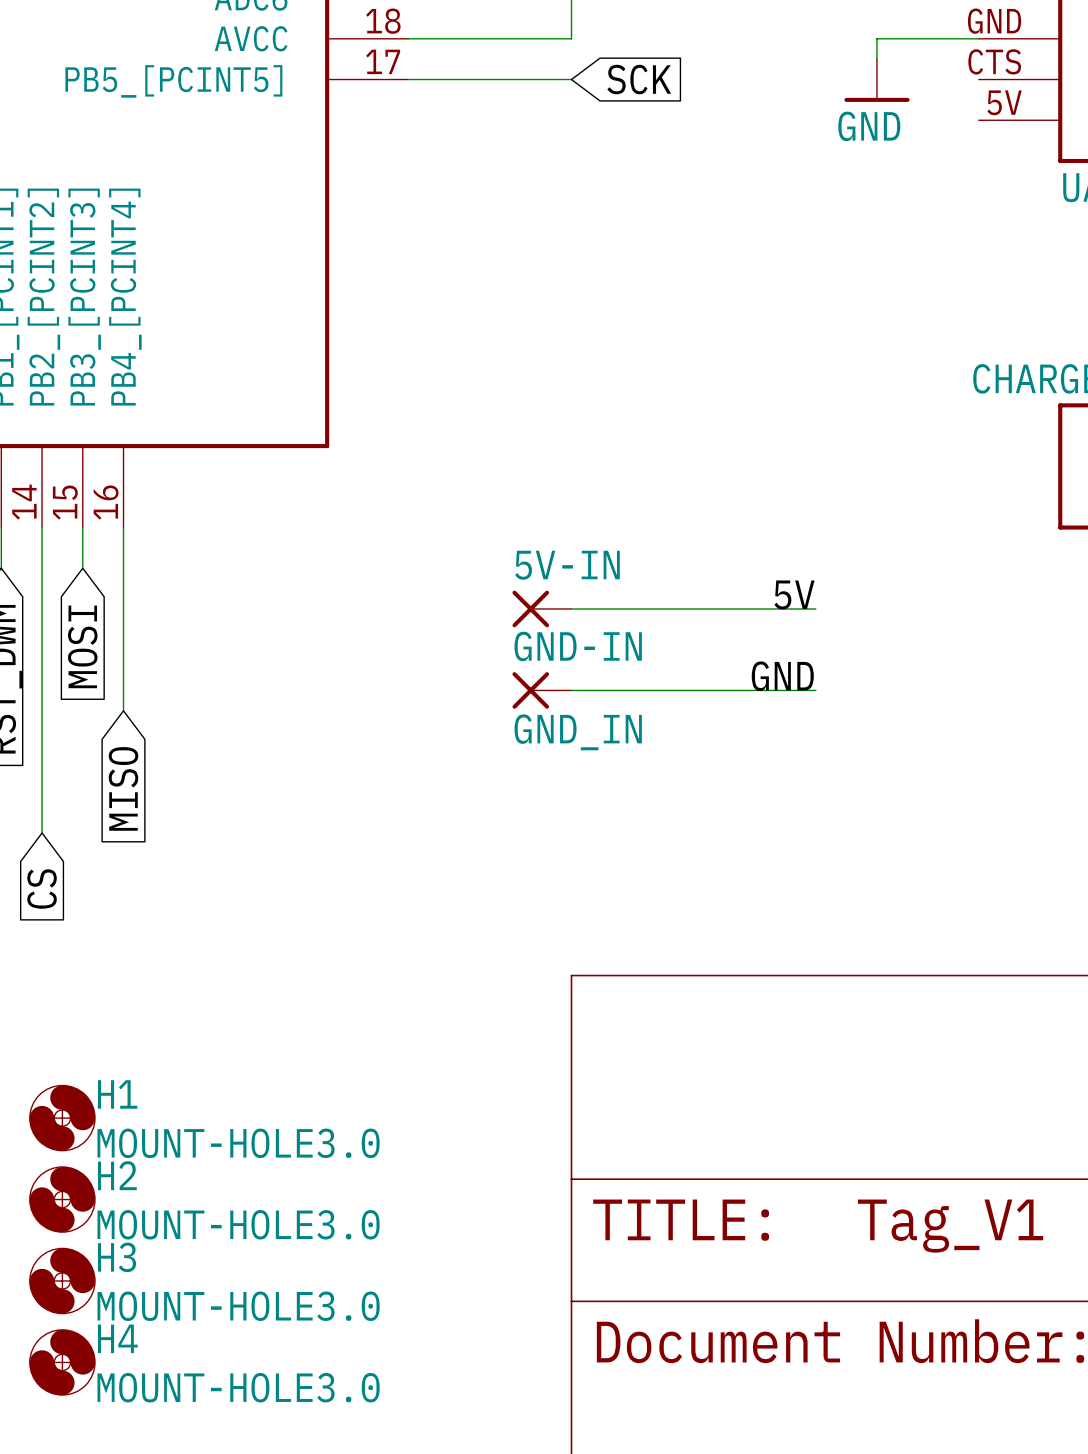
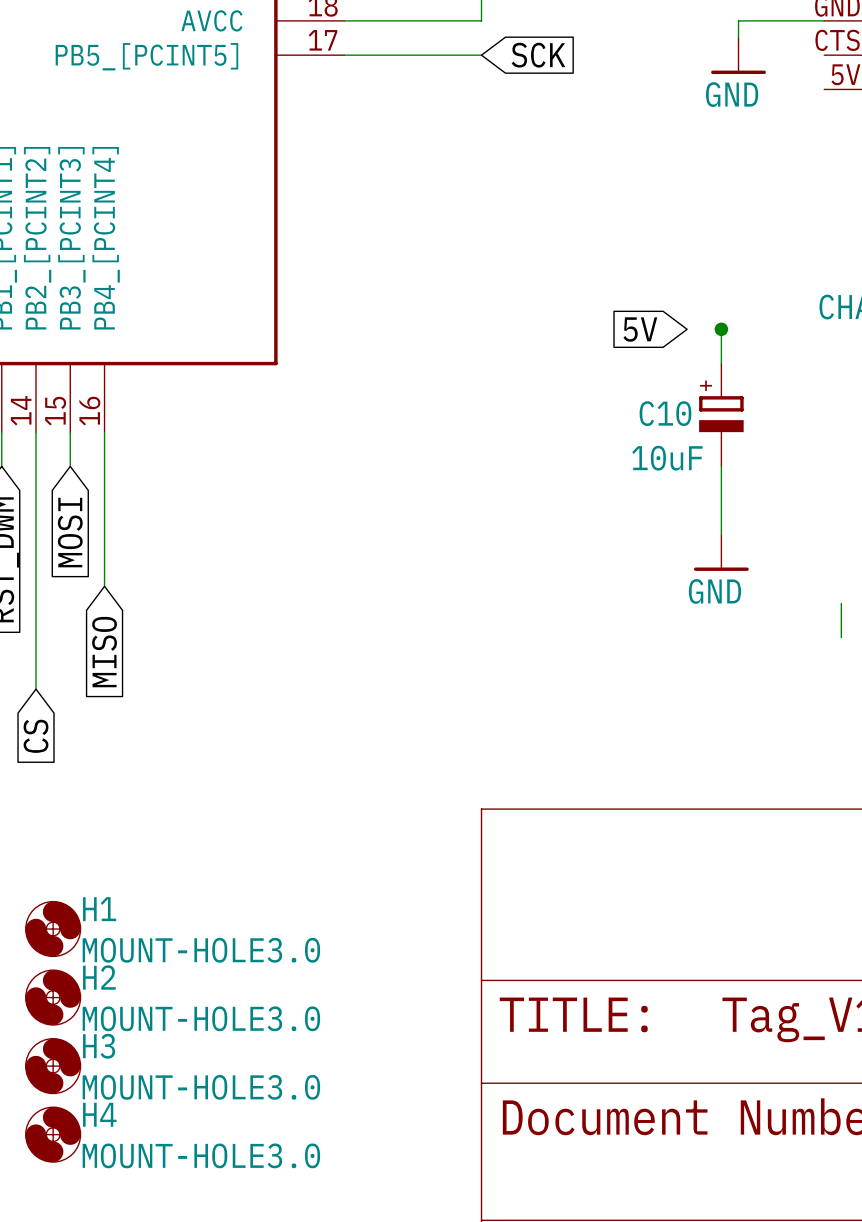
global label: none -> 5V (640, 329)
wire: none -> (721, 329) (721, 363)
junction: none -> (721, 329)
C10: none -> 10uF (721, 414)
wire: none -> (721, 466) (721, 534)
label: 5V (794, 594) -> none
5V-IN: (541, 608) -> none
wire: (571, 608) (815, 608) -> none
power symbol: none -> GND (721, 552)
label: GND (782, 676) -> none
GND-IN: GND_IN (541, 690) -> none
wire: (571, 690) (815, 690) -> none
wire: none -> (841, 603) (841, 637)

